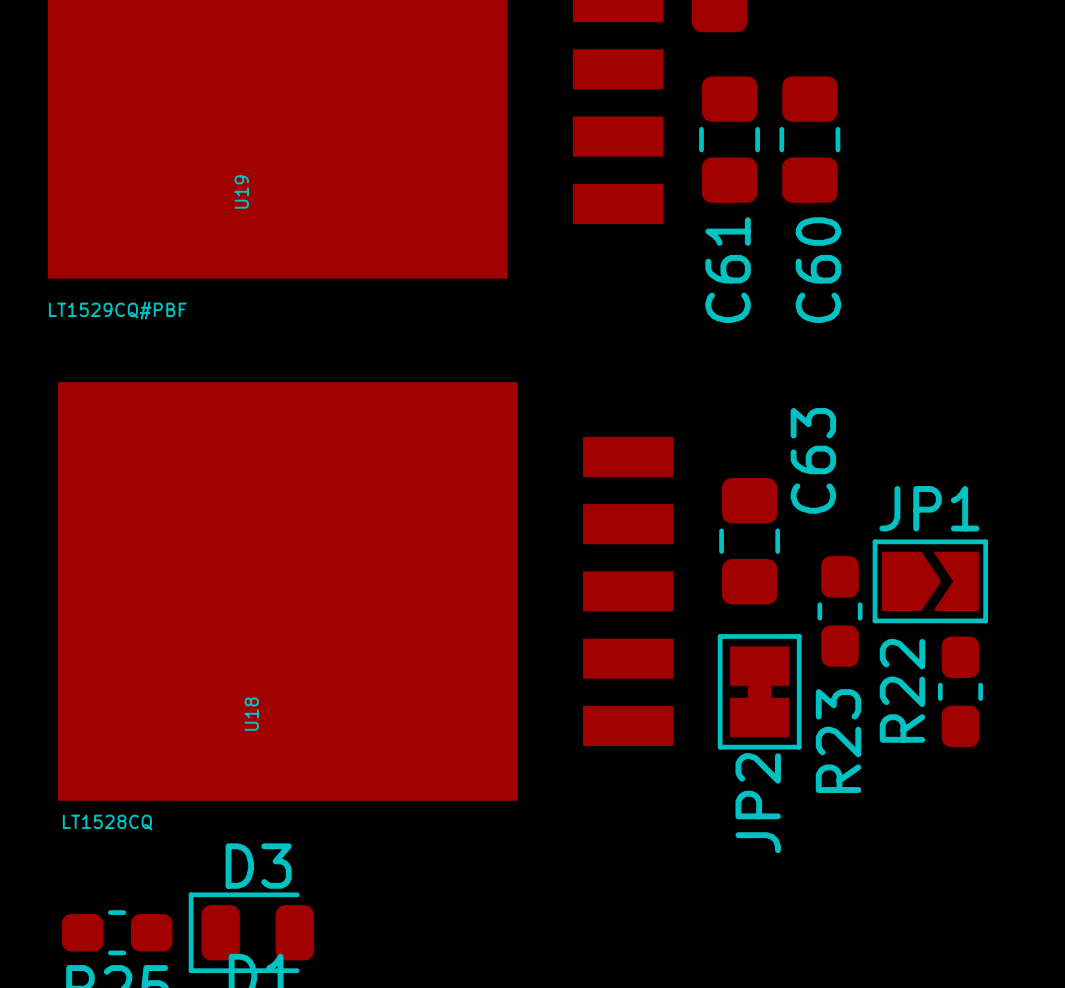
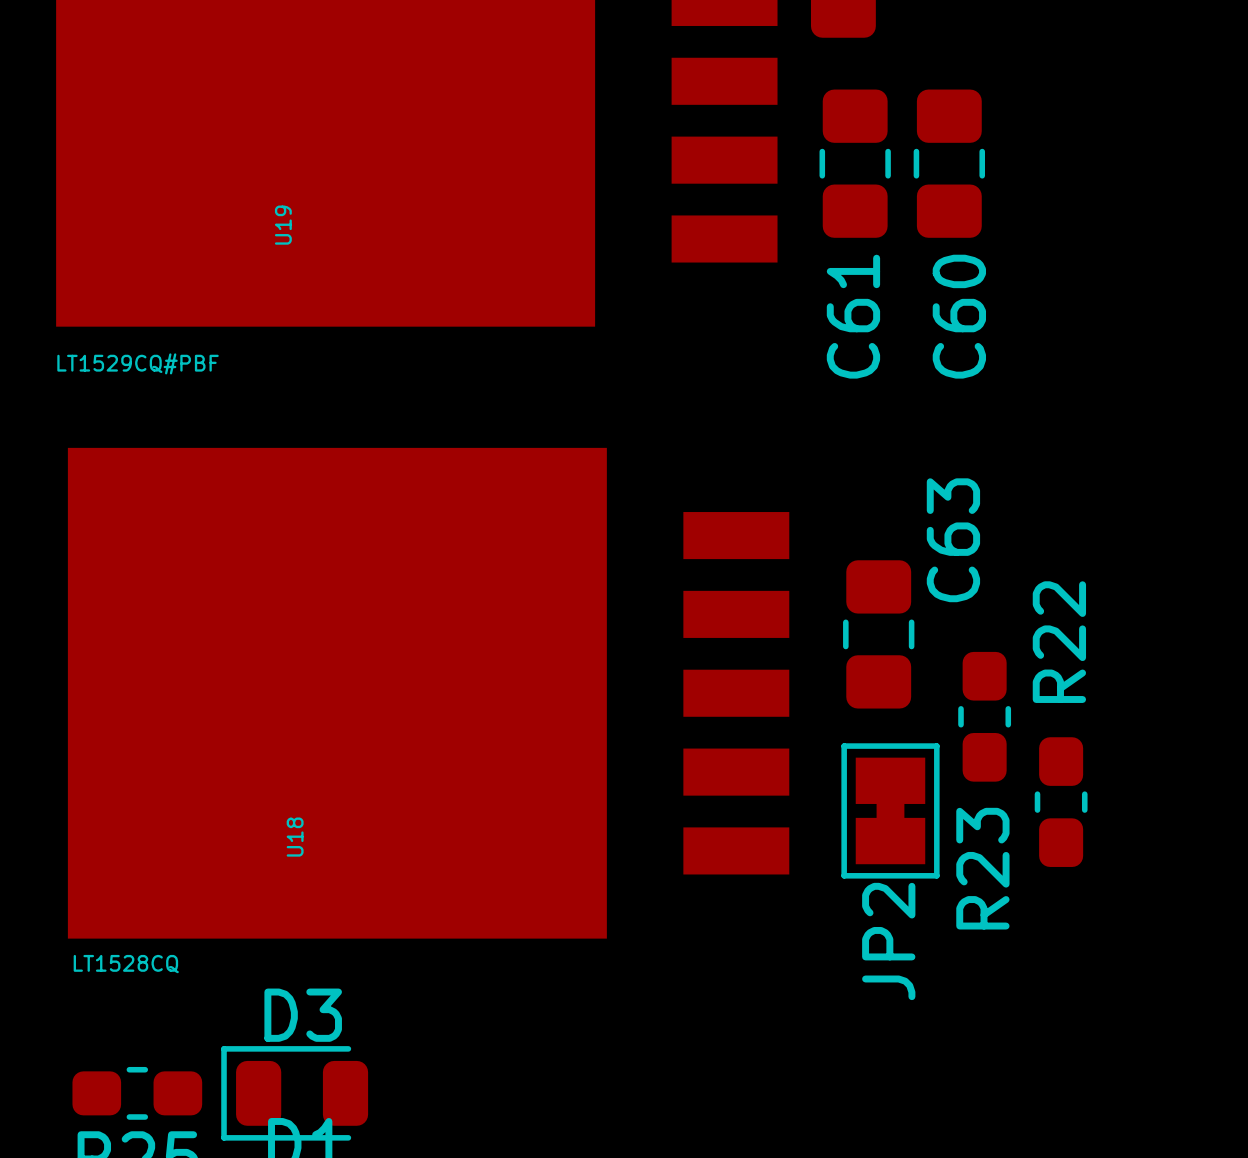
JP1: (930, 581) -> none
R22 name position: R22 (902, 690) -> R22 (1059, 642)
R22 position: (960, 691) -> (1061, 802)

